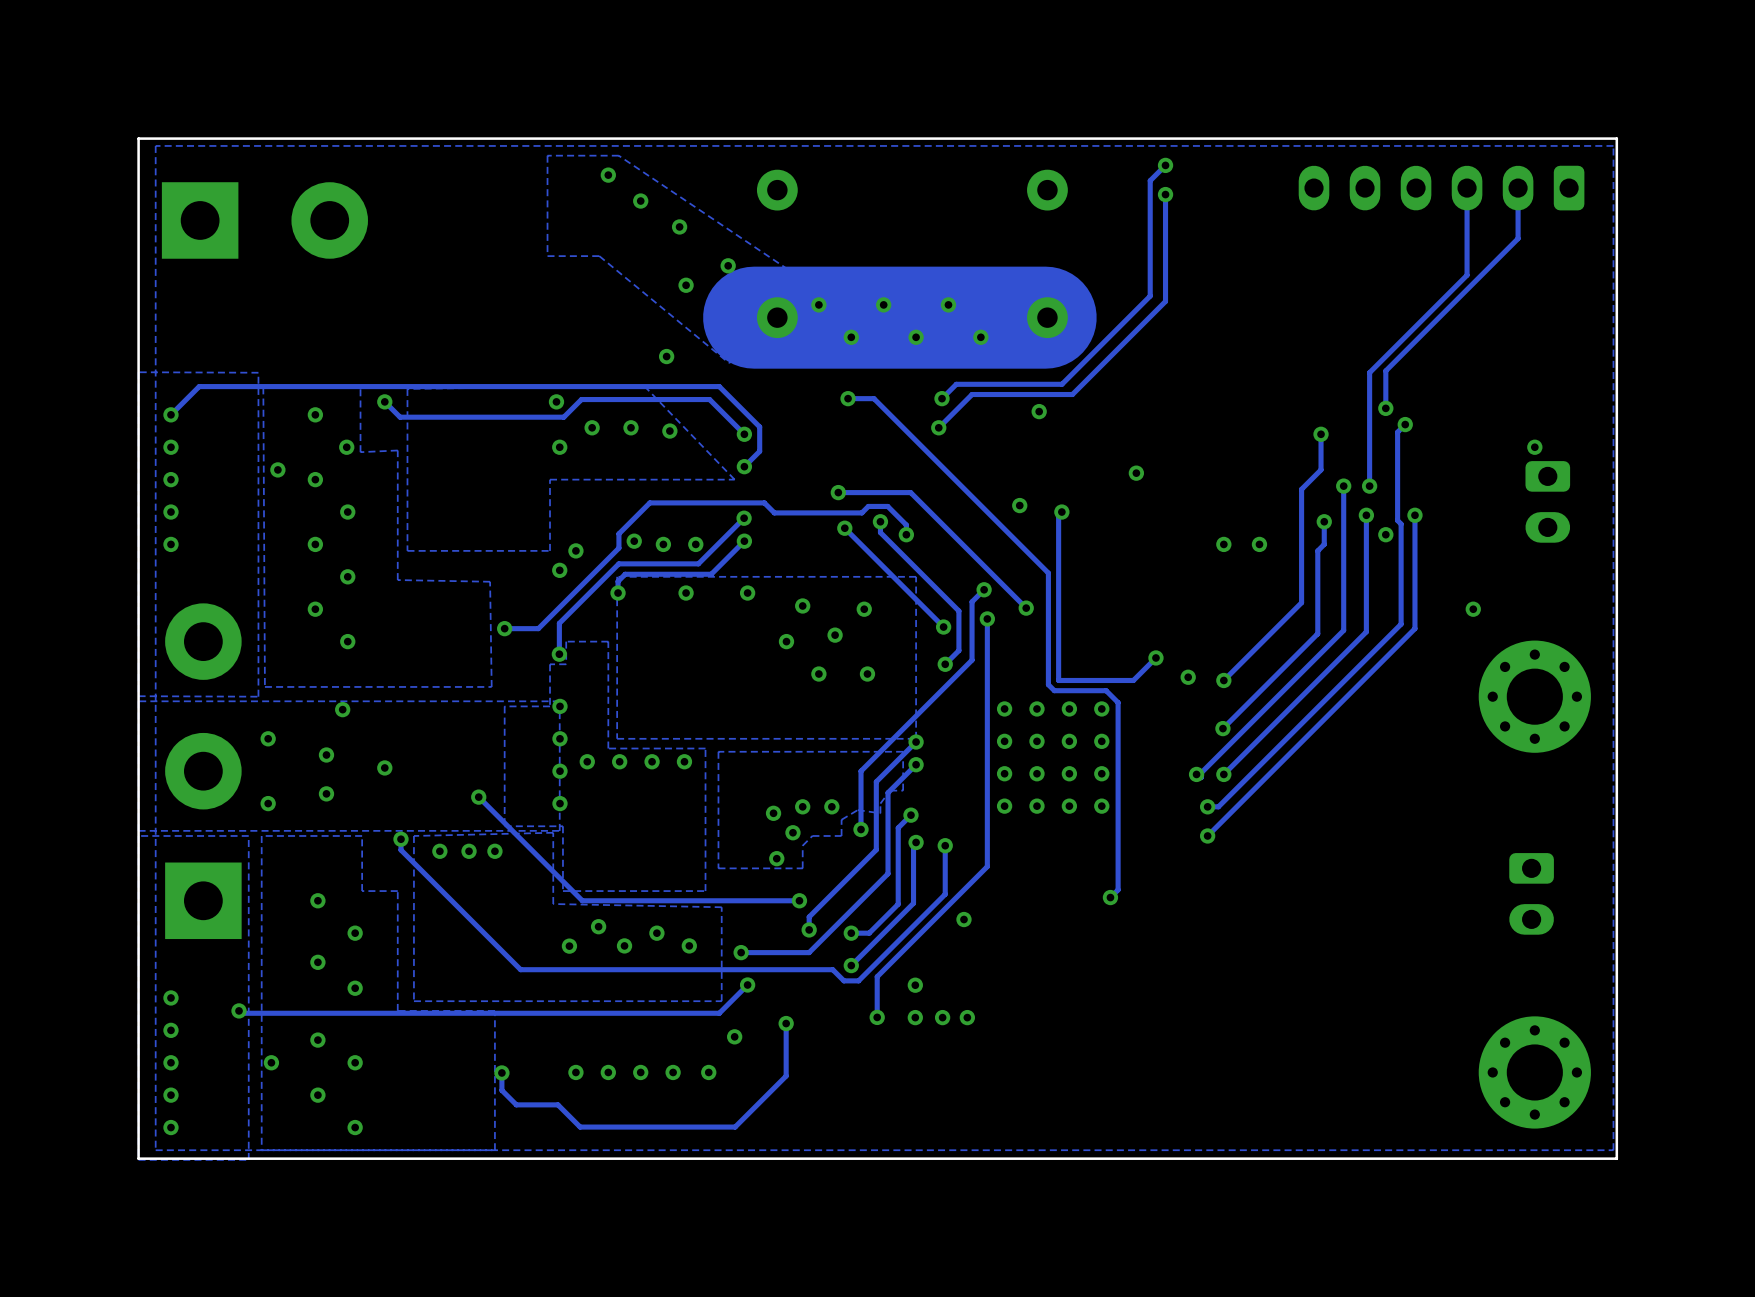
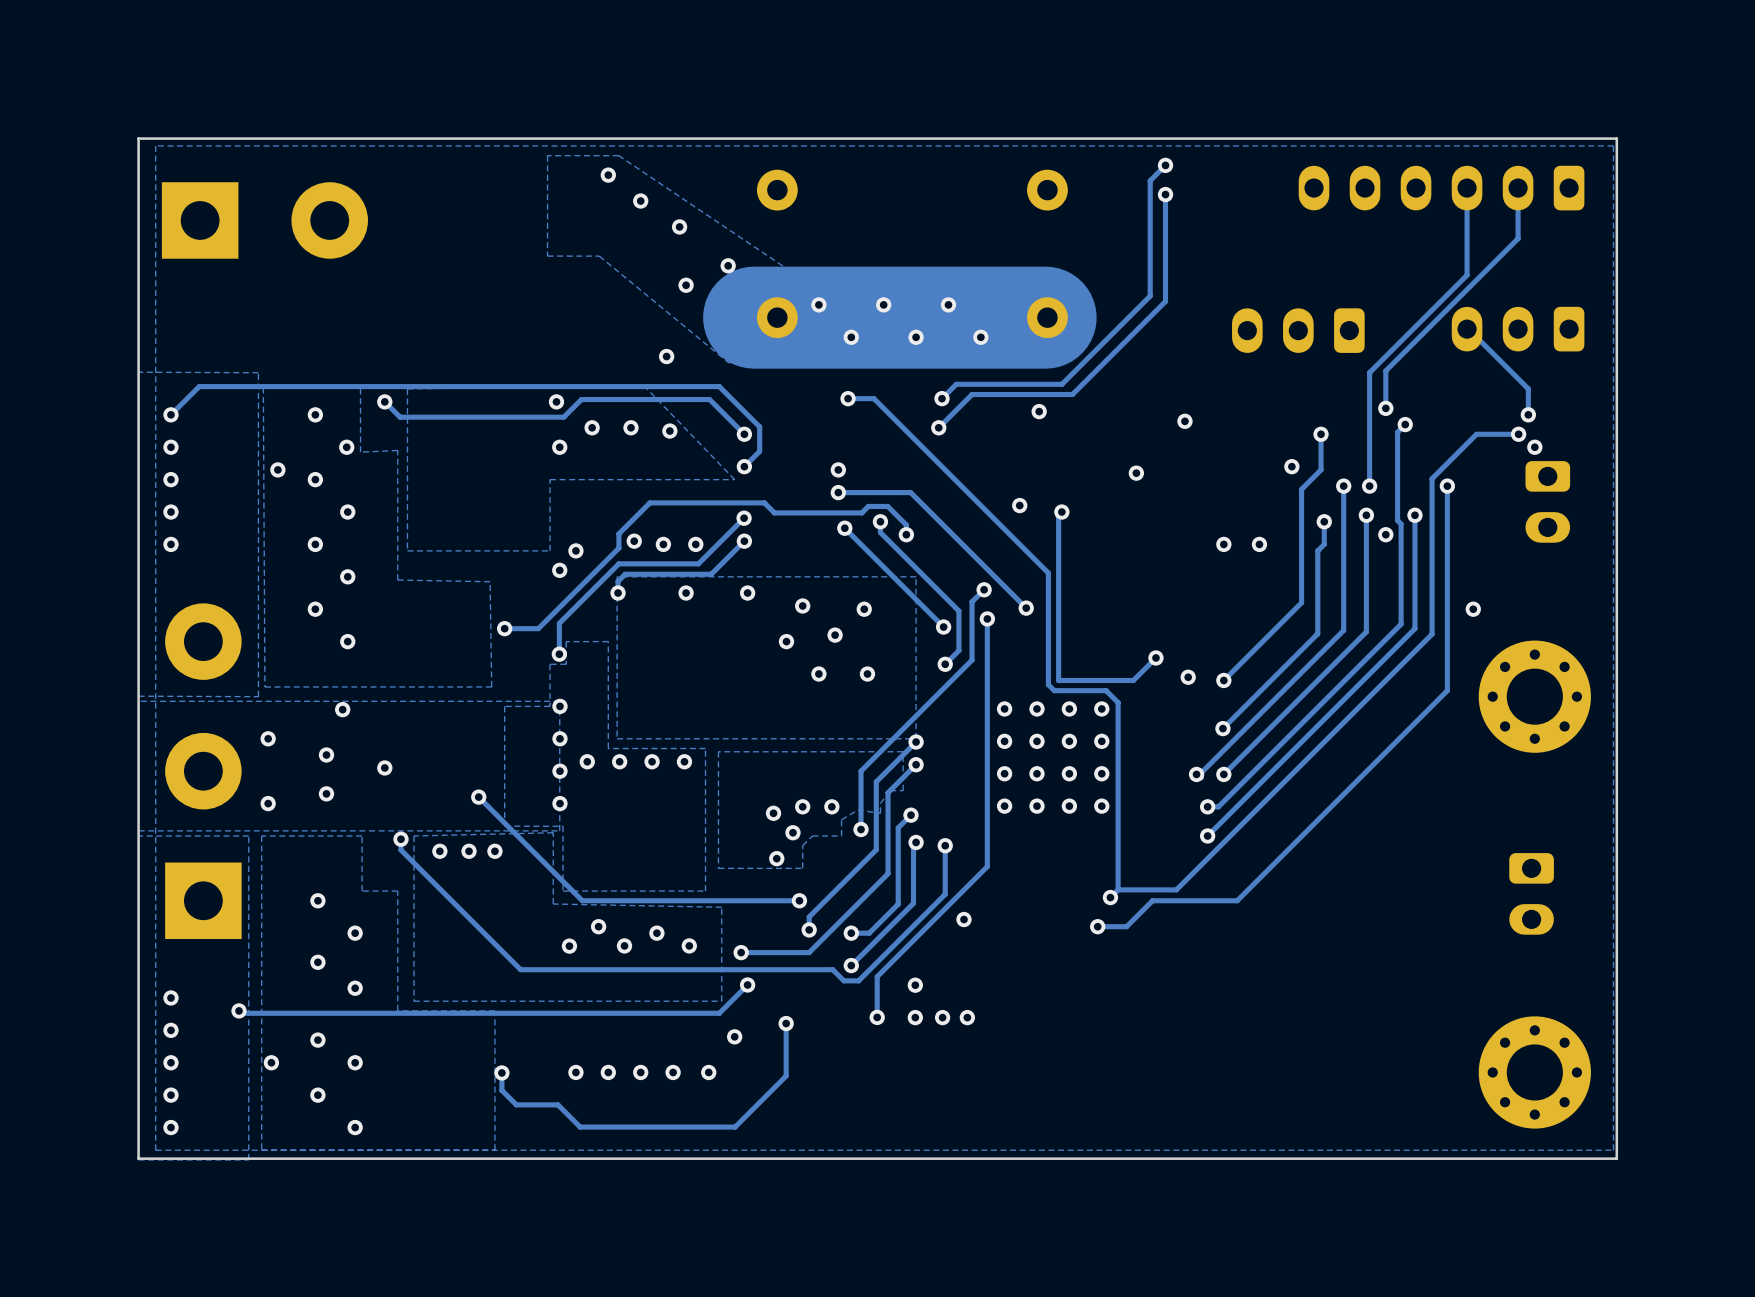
track: none -> (1467, 329) (1528, 388) (1528, 414)
part: none -> (1518, 329)
part: none -> (1298, 330)
via: none -> (1528, 414)
via: none -> (1184, 421)
track: none -> (1518, 434) (1476, 434) (1432, 478) (1432, 634) (1176, 889) (1118, 889)
via: none -> (1518, 434)
via: none -> (1291, 466)
via: none -> (838, 469)
track: none -> (1447, 486) (1447, 690) (1237, 900) (1152, 900) (1126, 926) (1097, 926)
via: none -> (1447, 486)
via: none -> (1097, 926)

